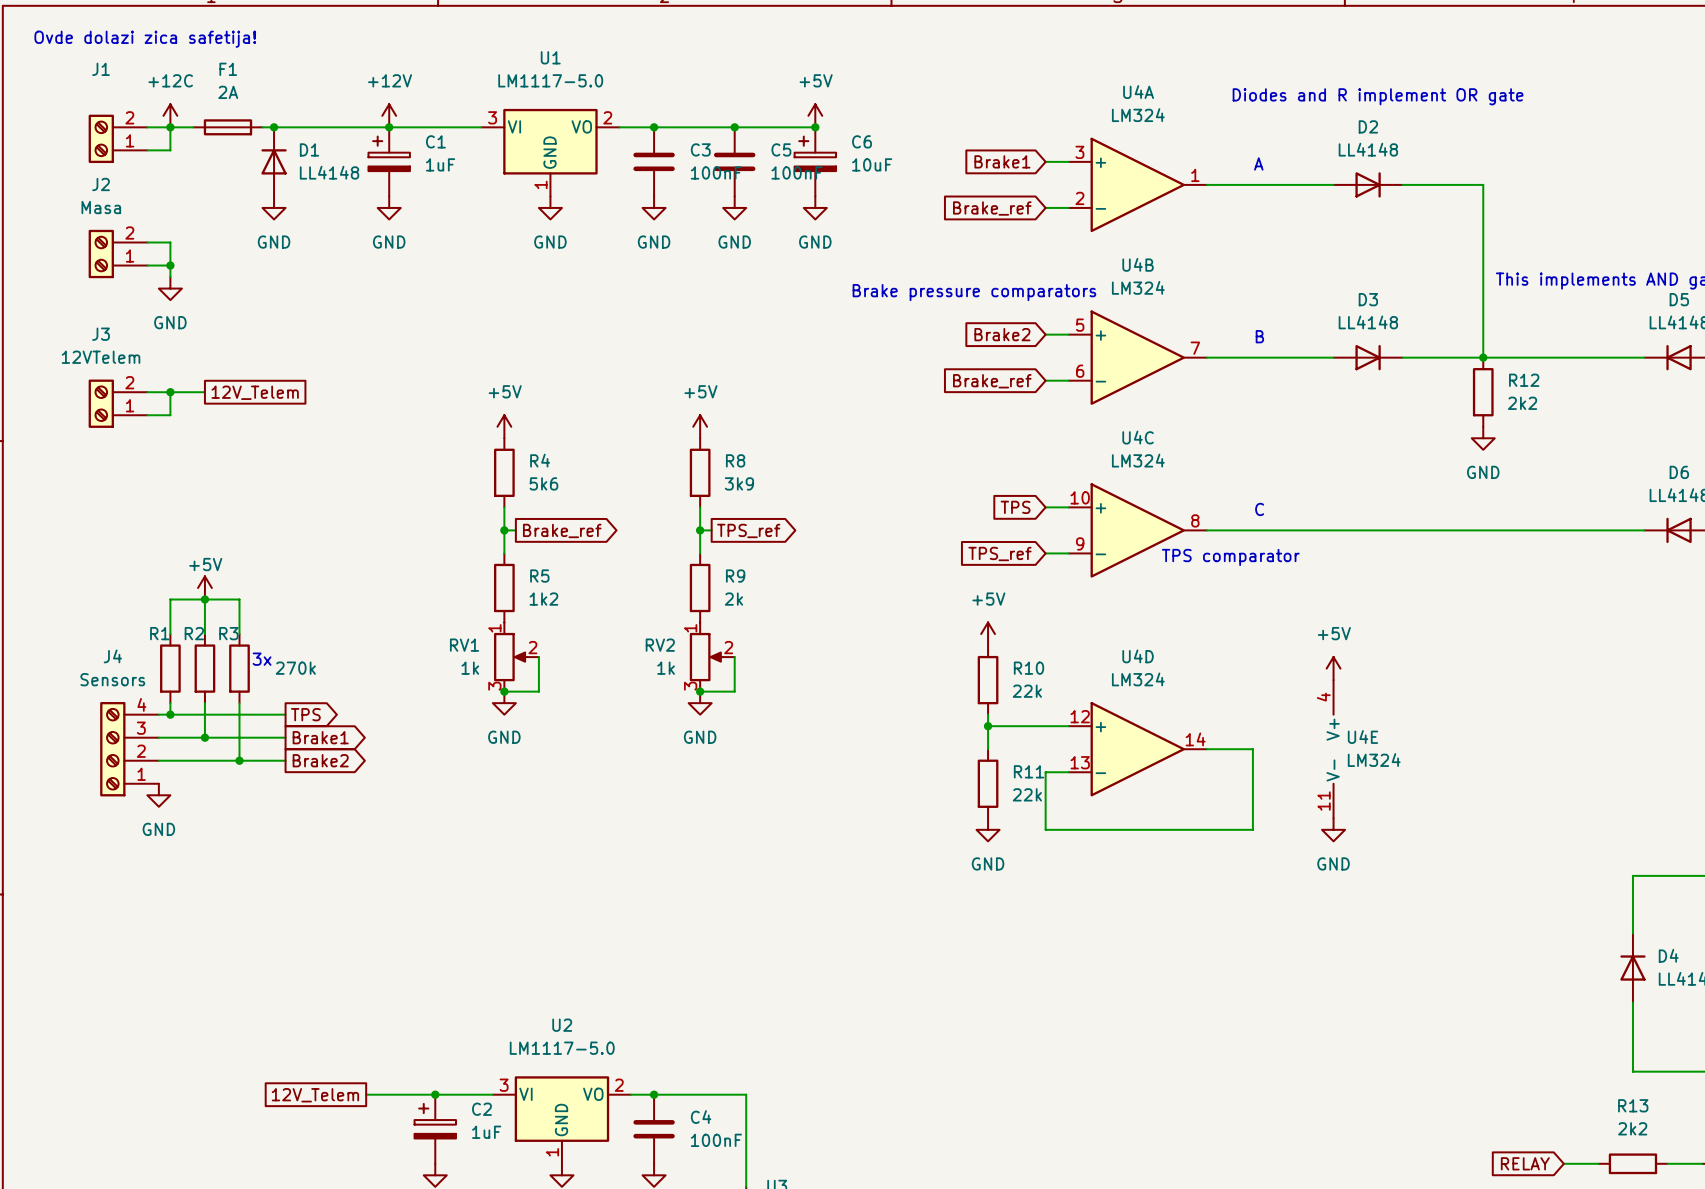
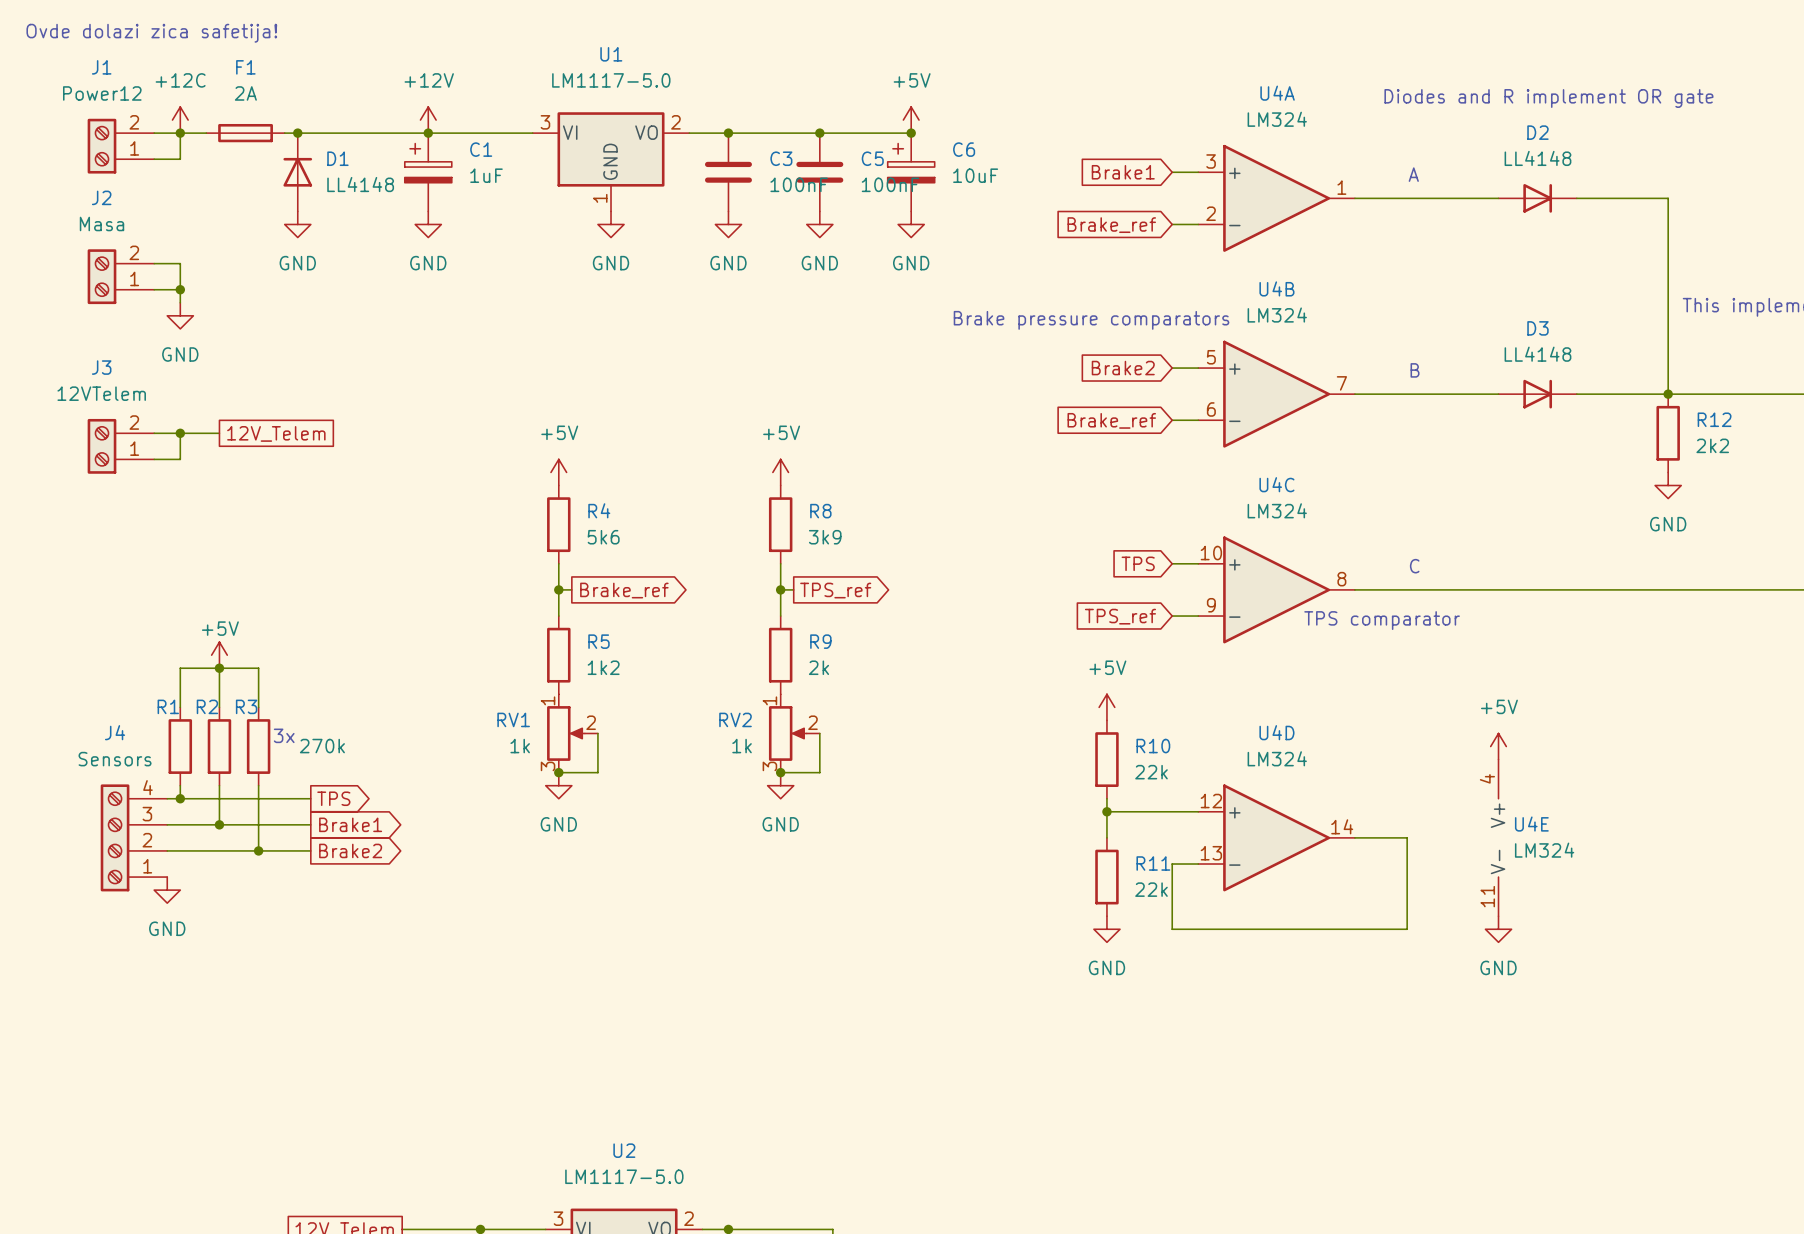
J1 value: none -> Power12 (102, 93)

